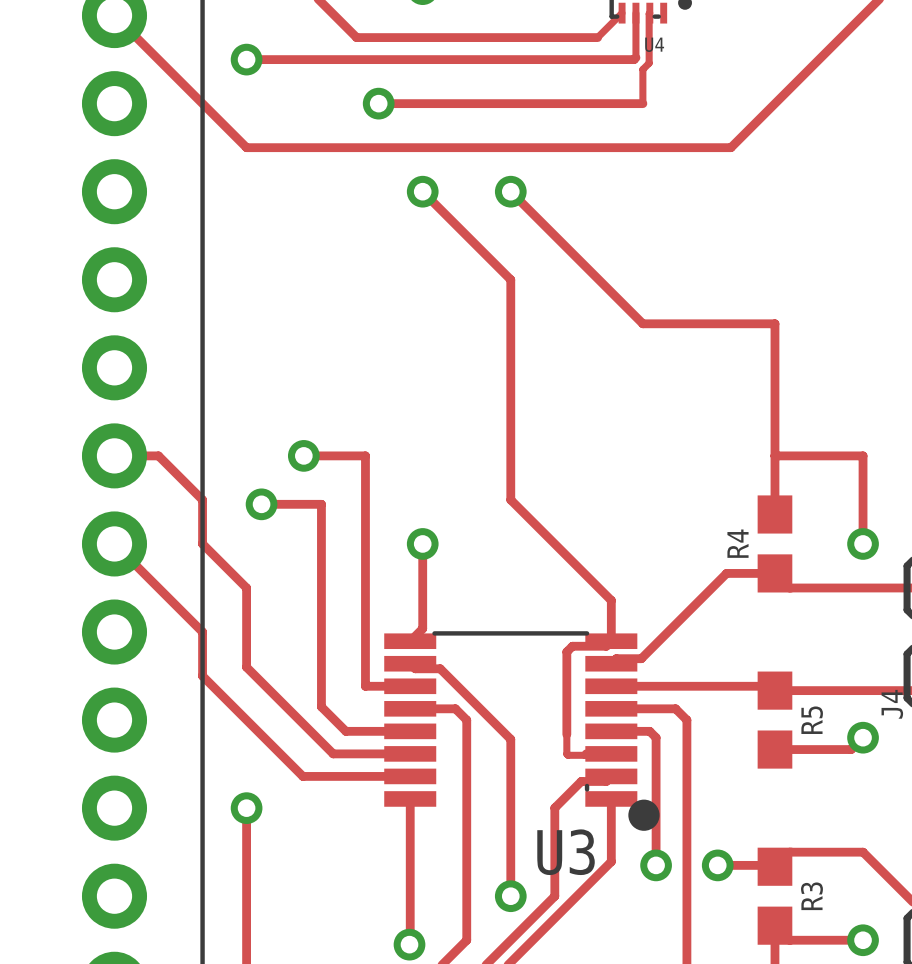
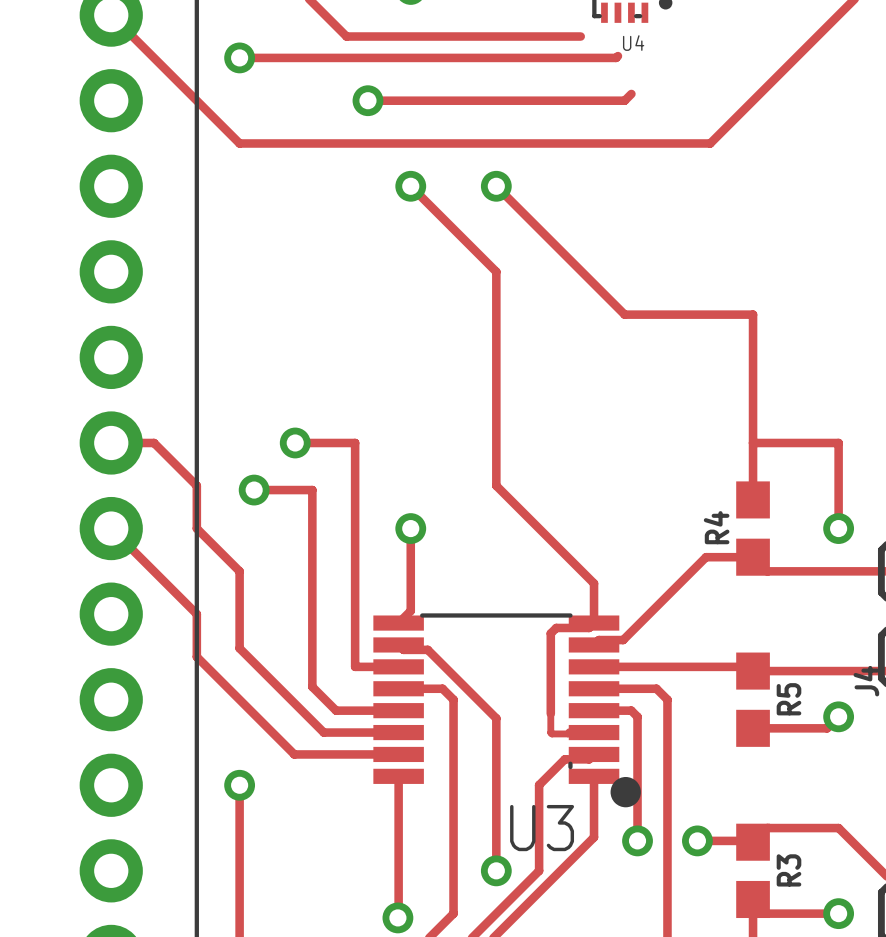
track: (622, 13) (597, 37) -> none
track: (635, 13) (635, 57) -> none
track: (649, 13) (649, 63) (642, 69) (642, 103) -> (631, 93) (624, 100)

